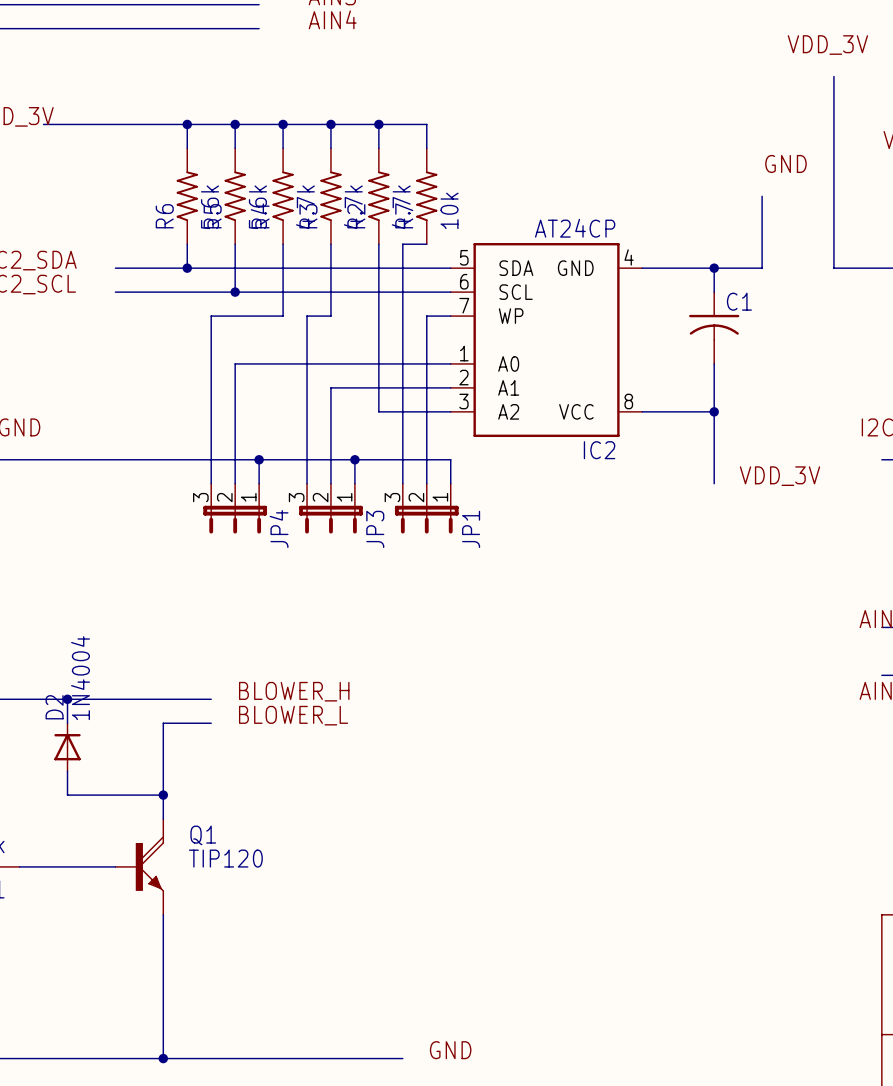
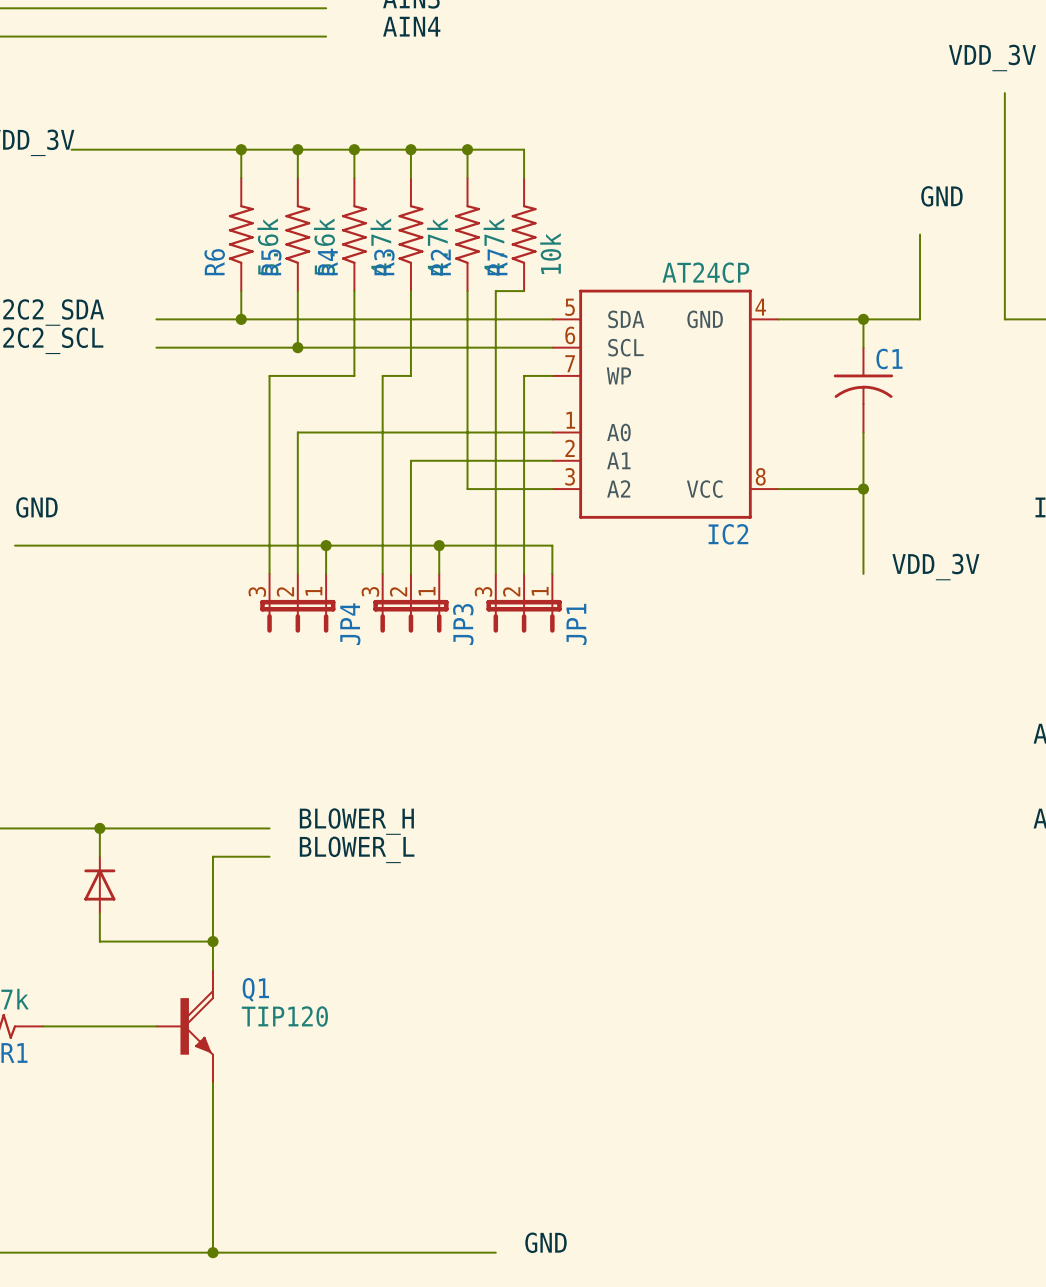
D2: 1N4004 (67, 747) -> none

